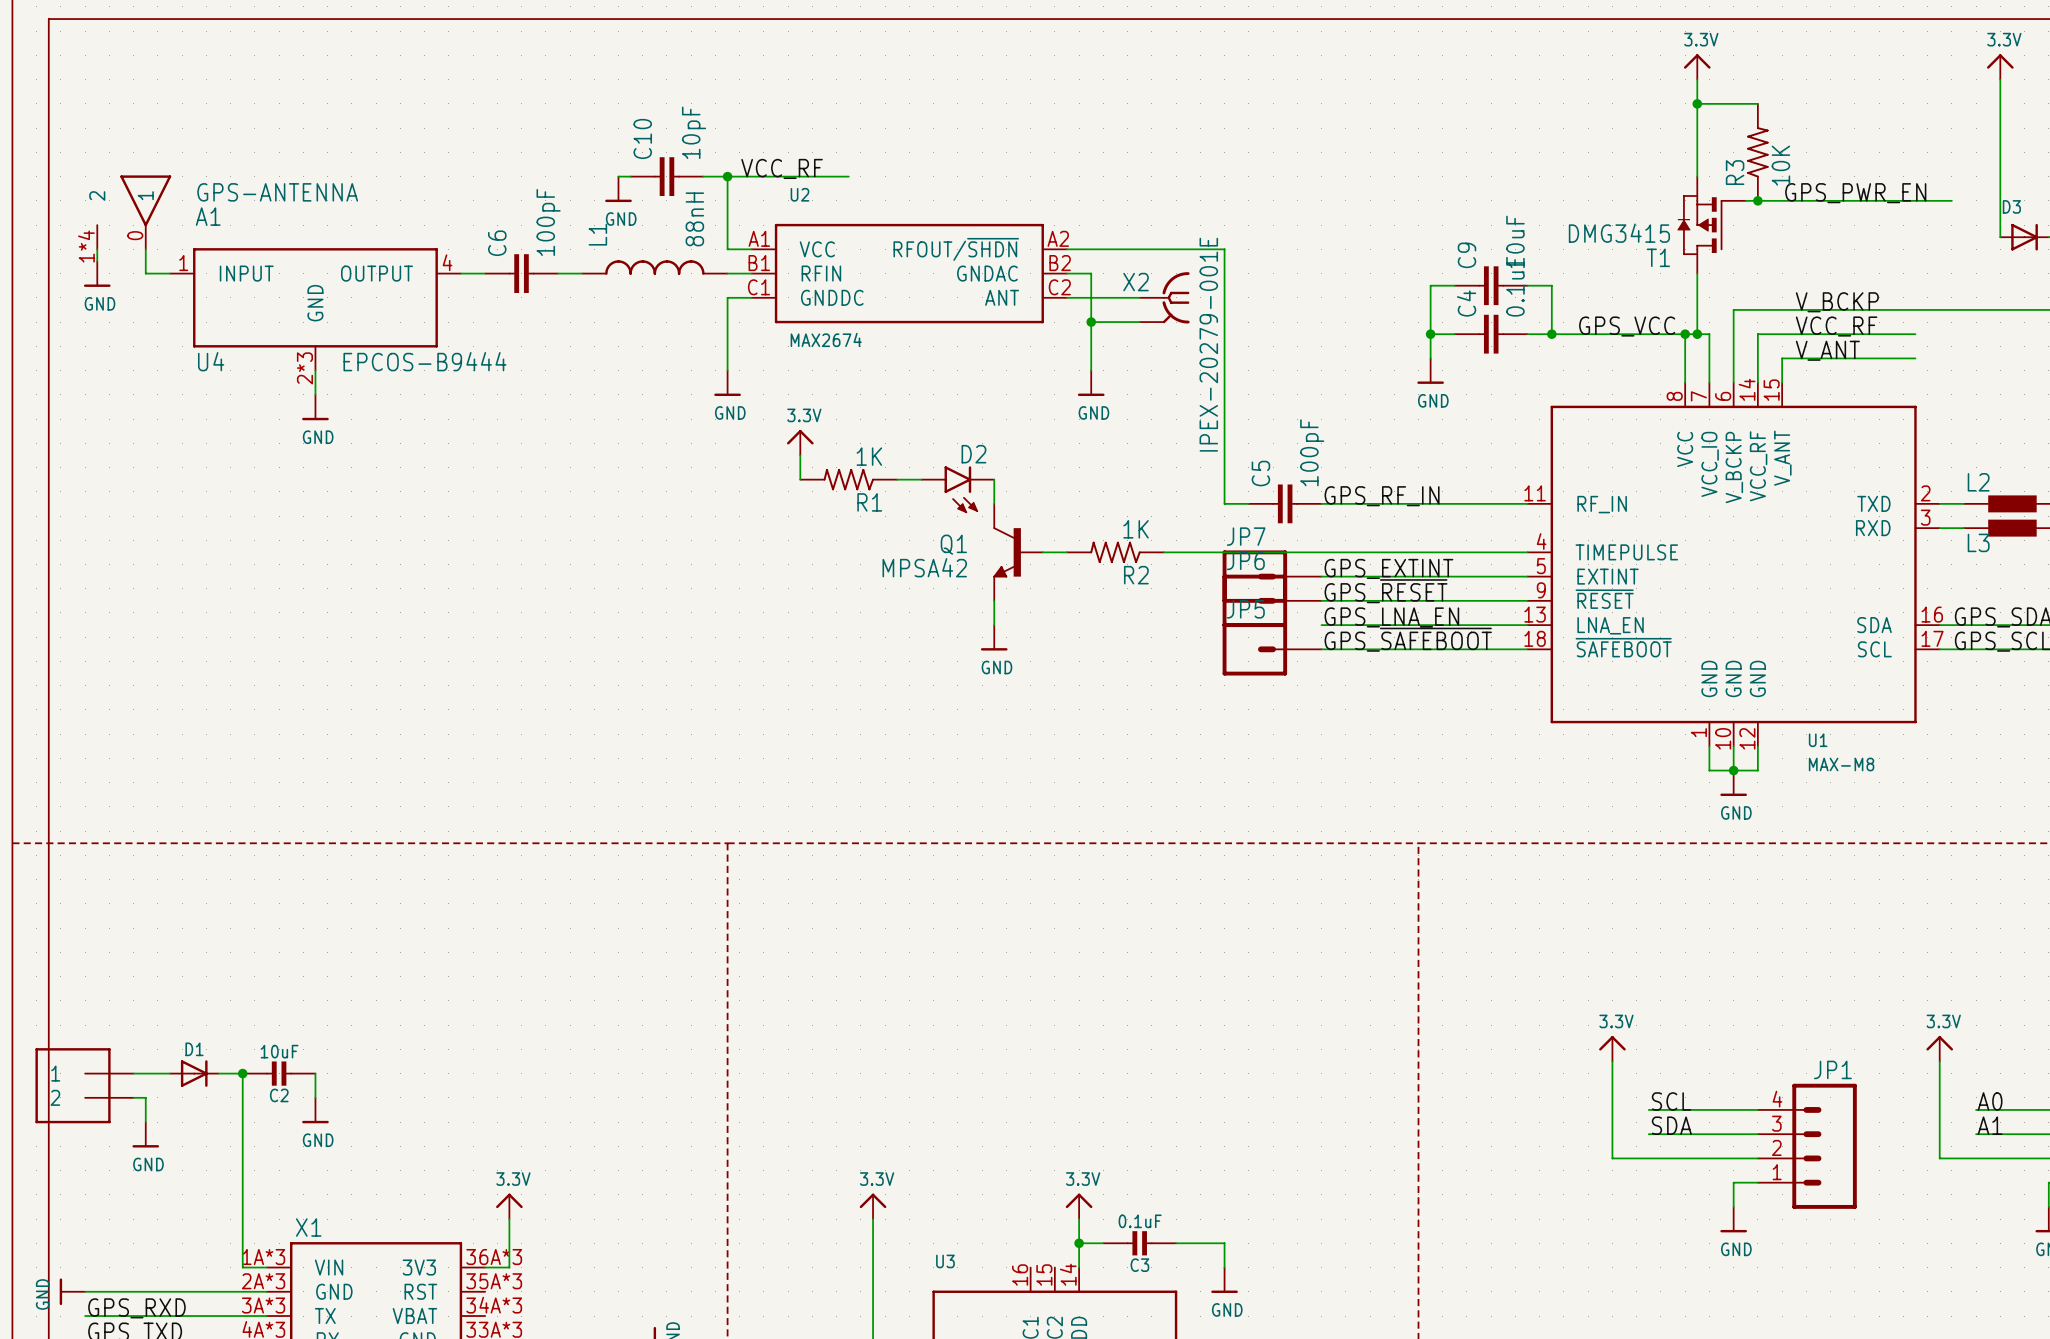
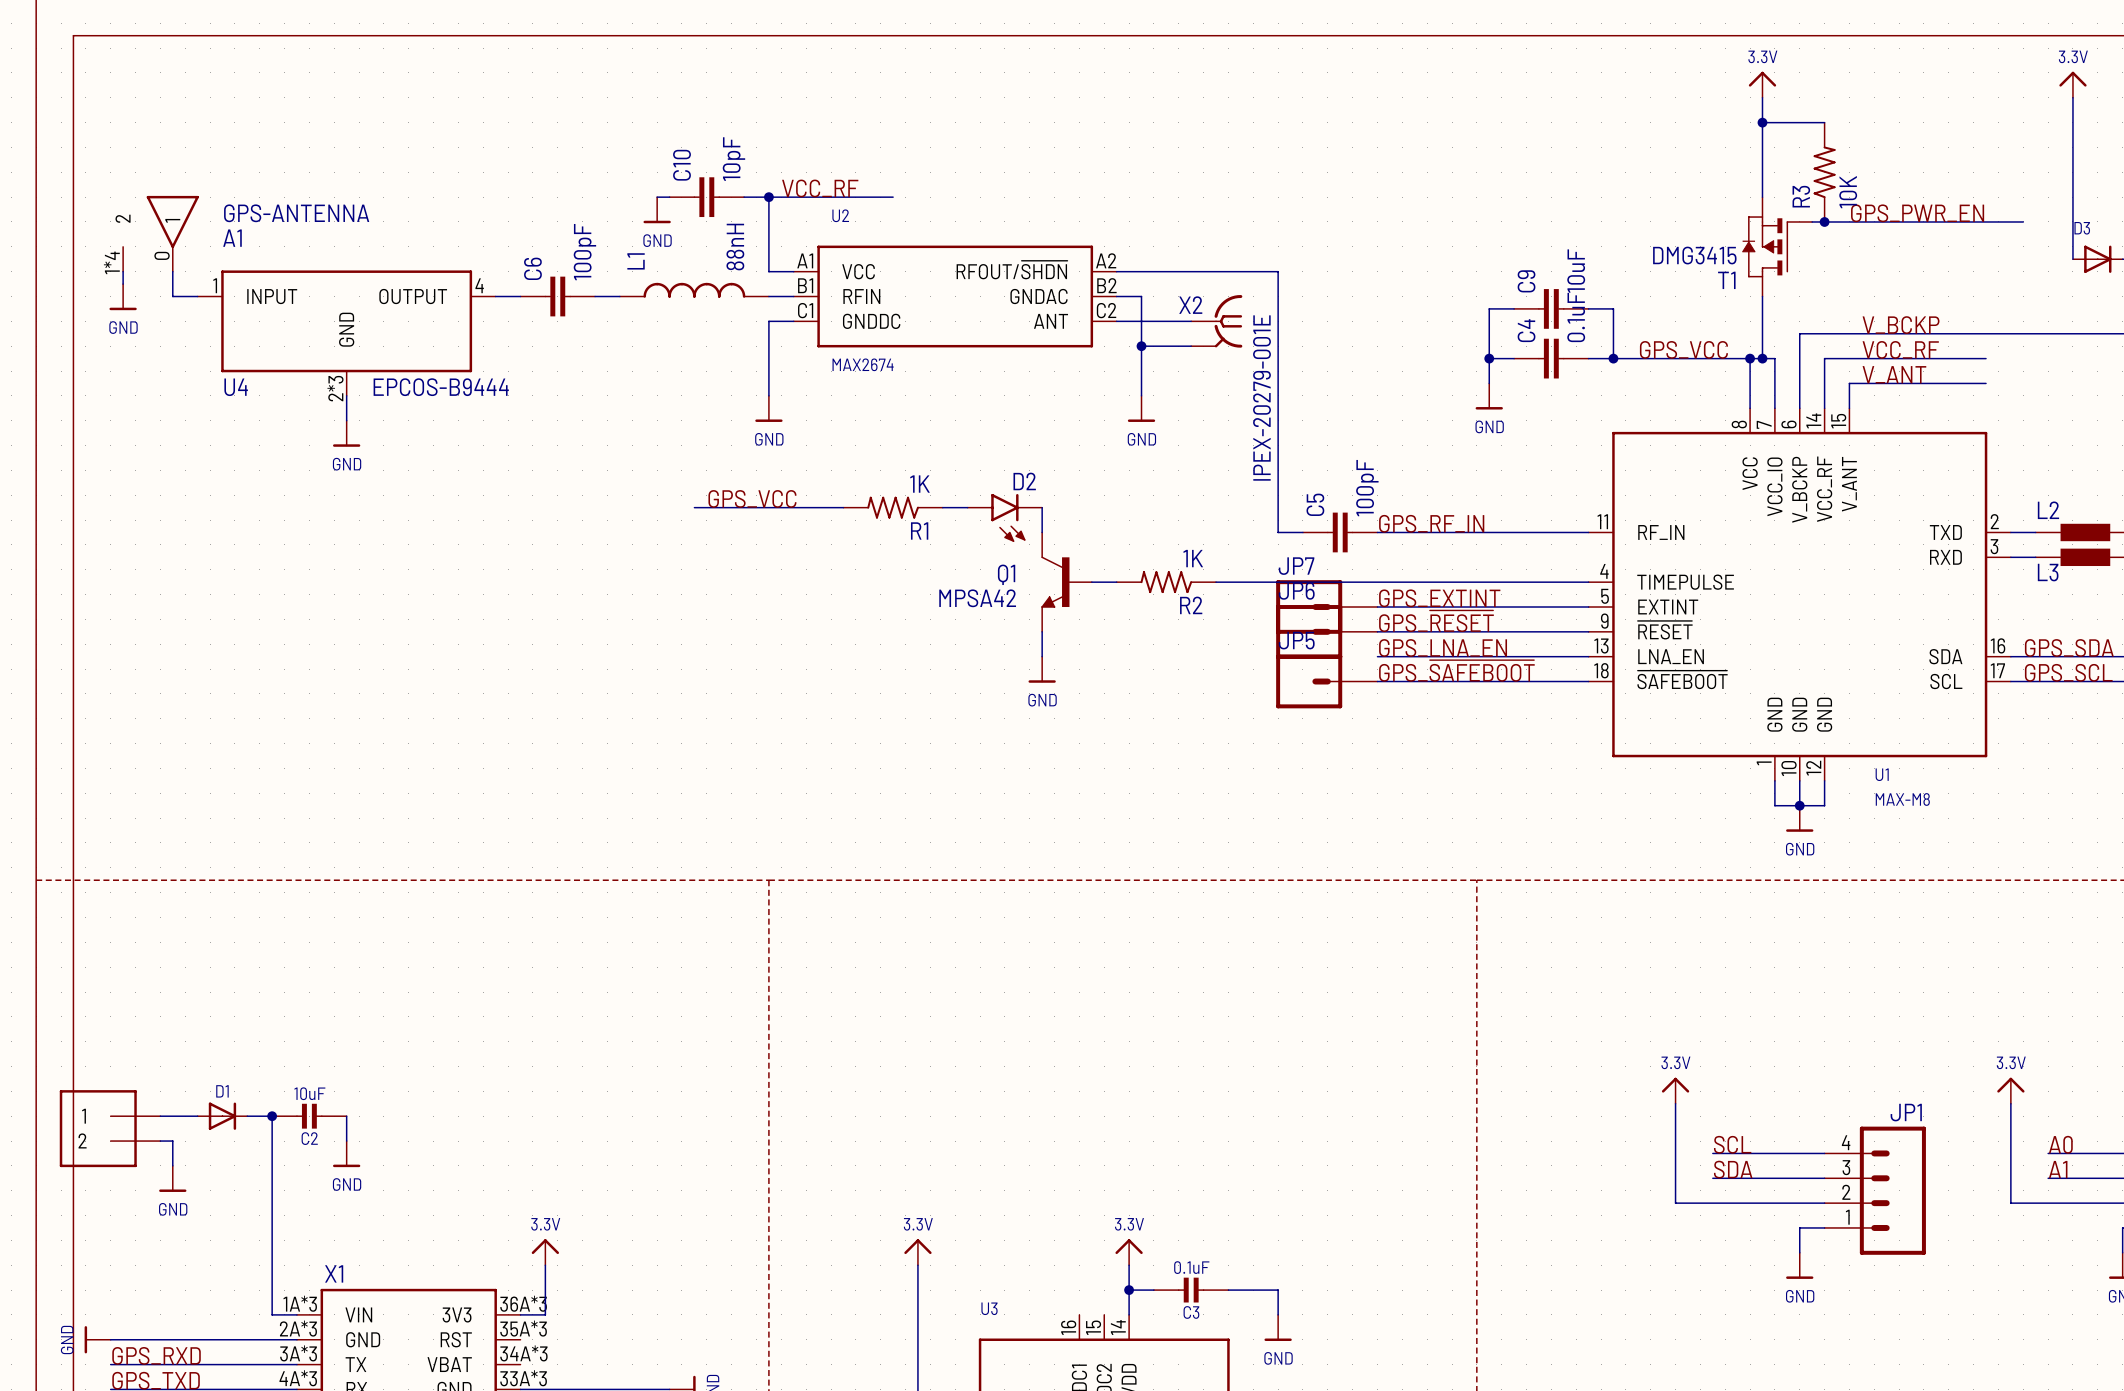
power symbol: 3.3V (800, 442) -> none
wire: (800, 455) (800, 479) -> (694, 507) (843, 507)
label: none -> GPS_VCC (752, 498)

